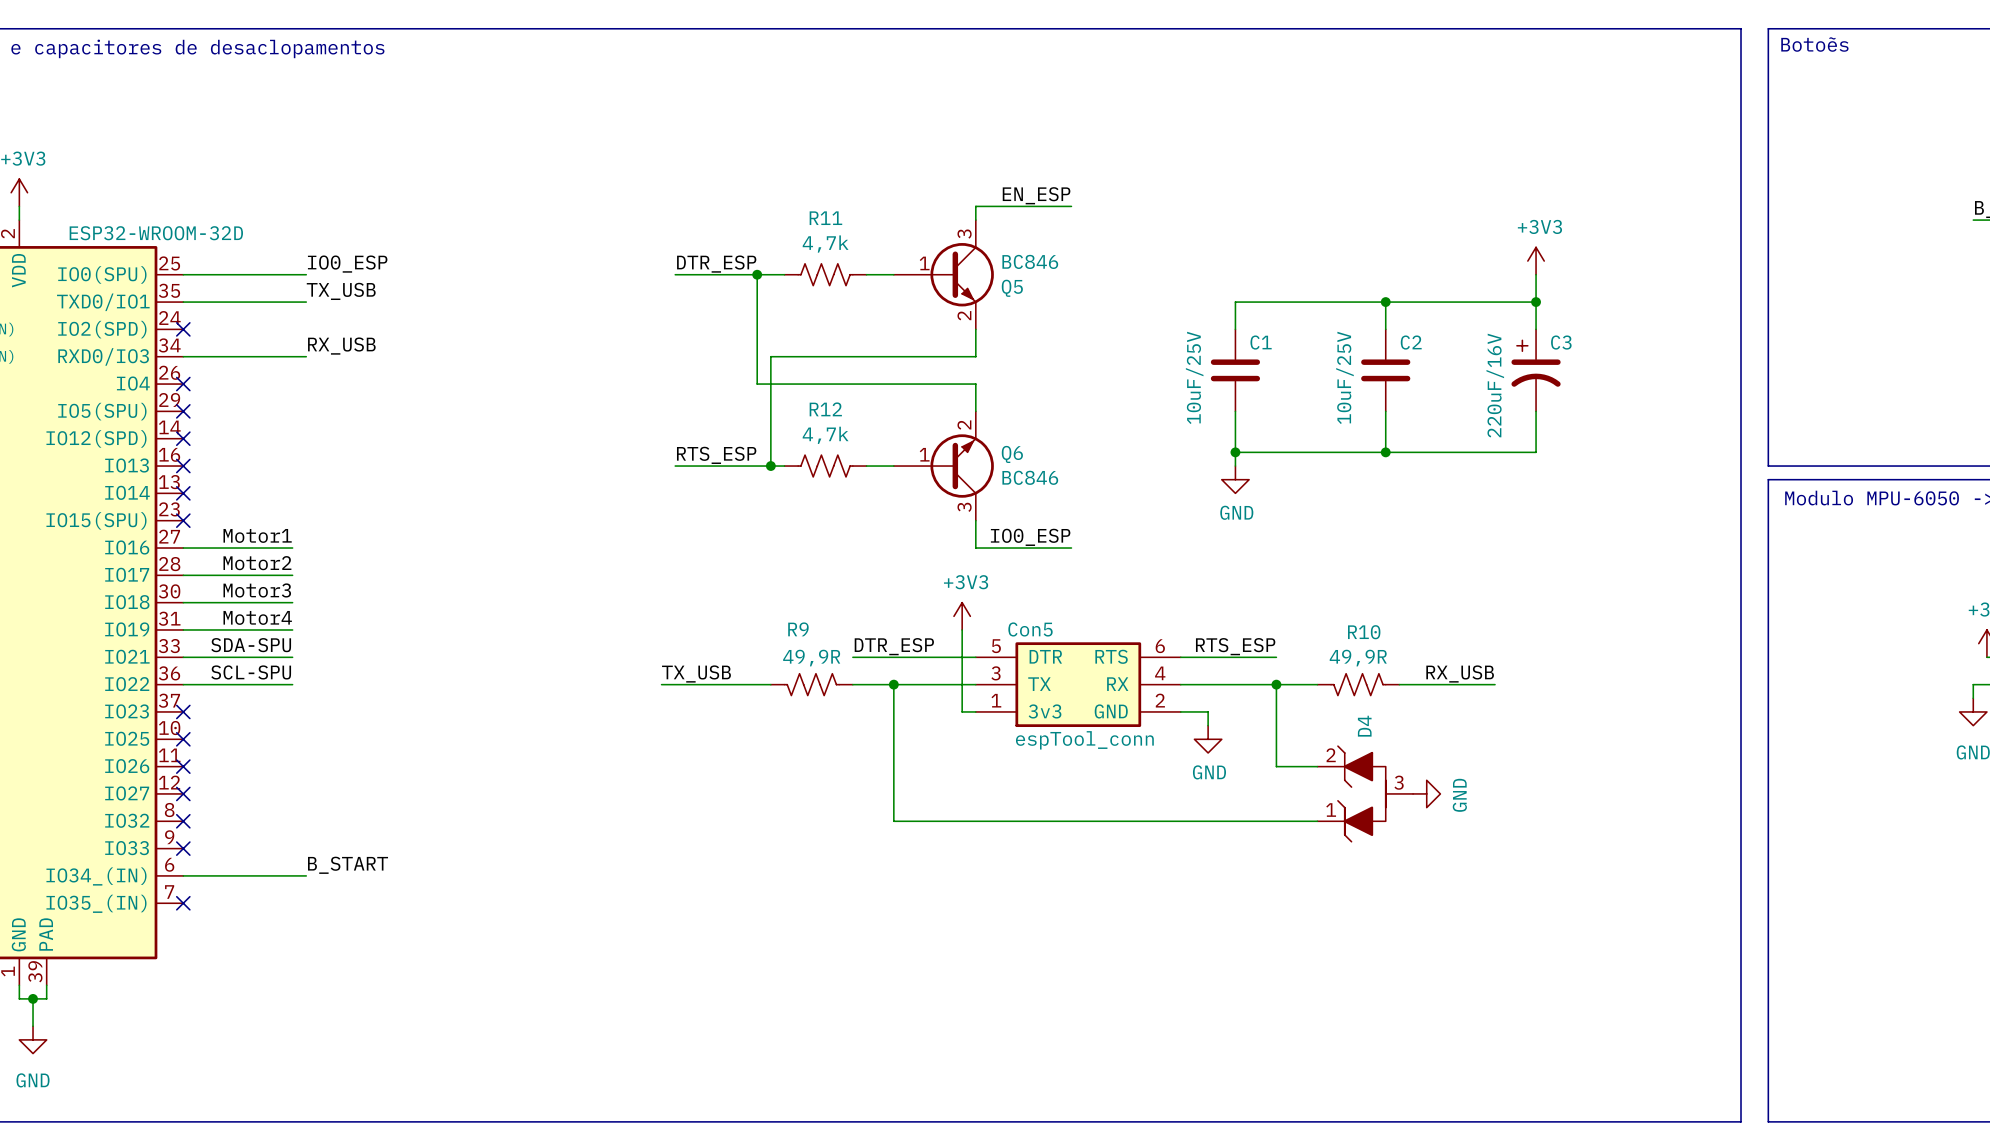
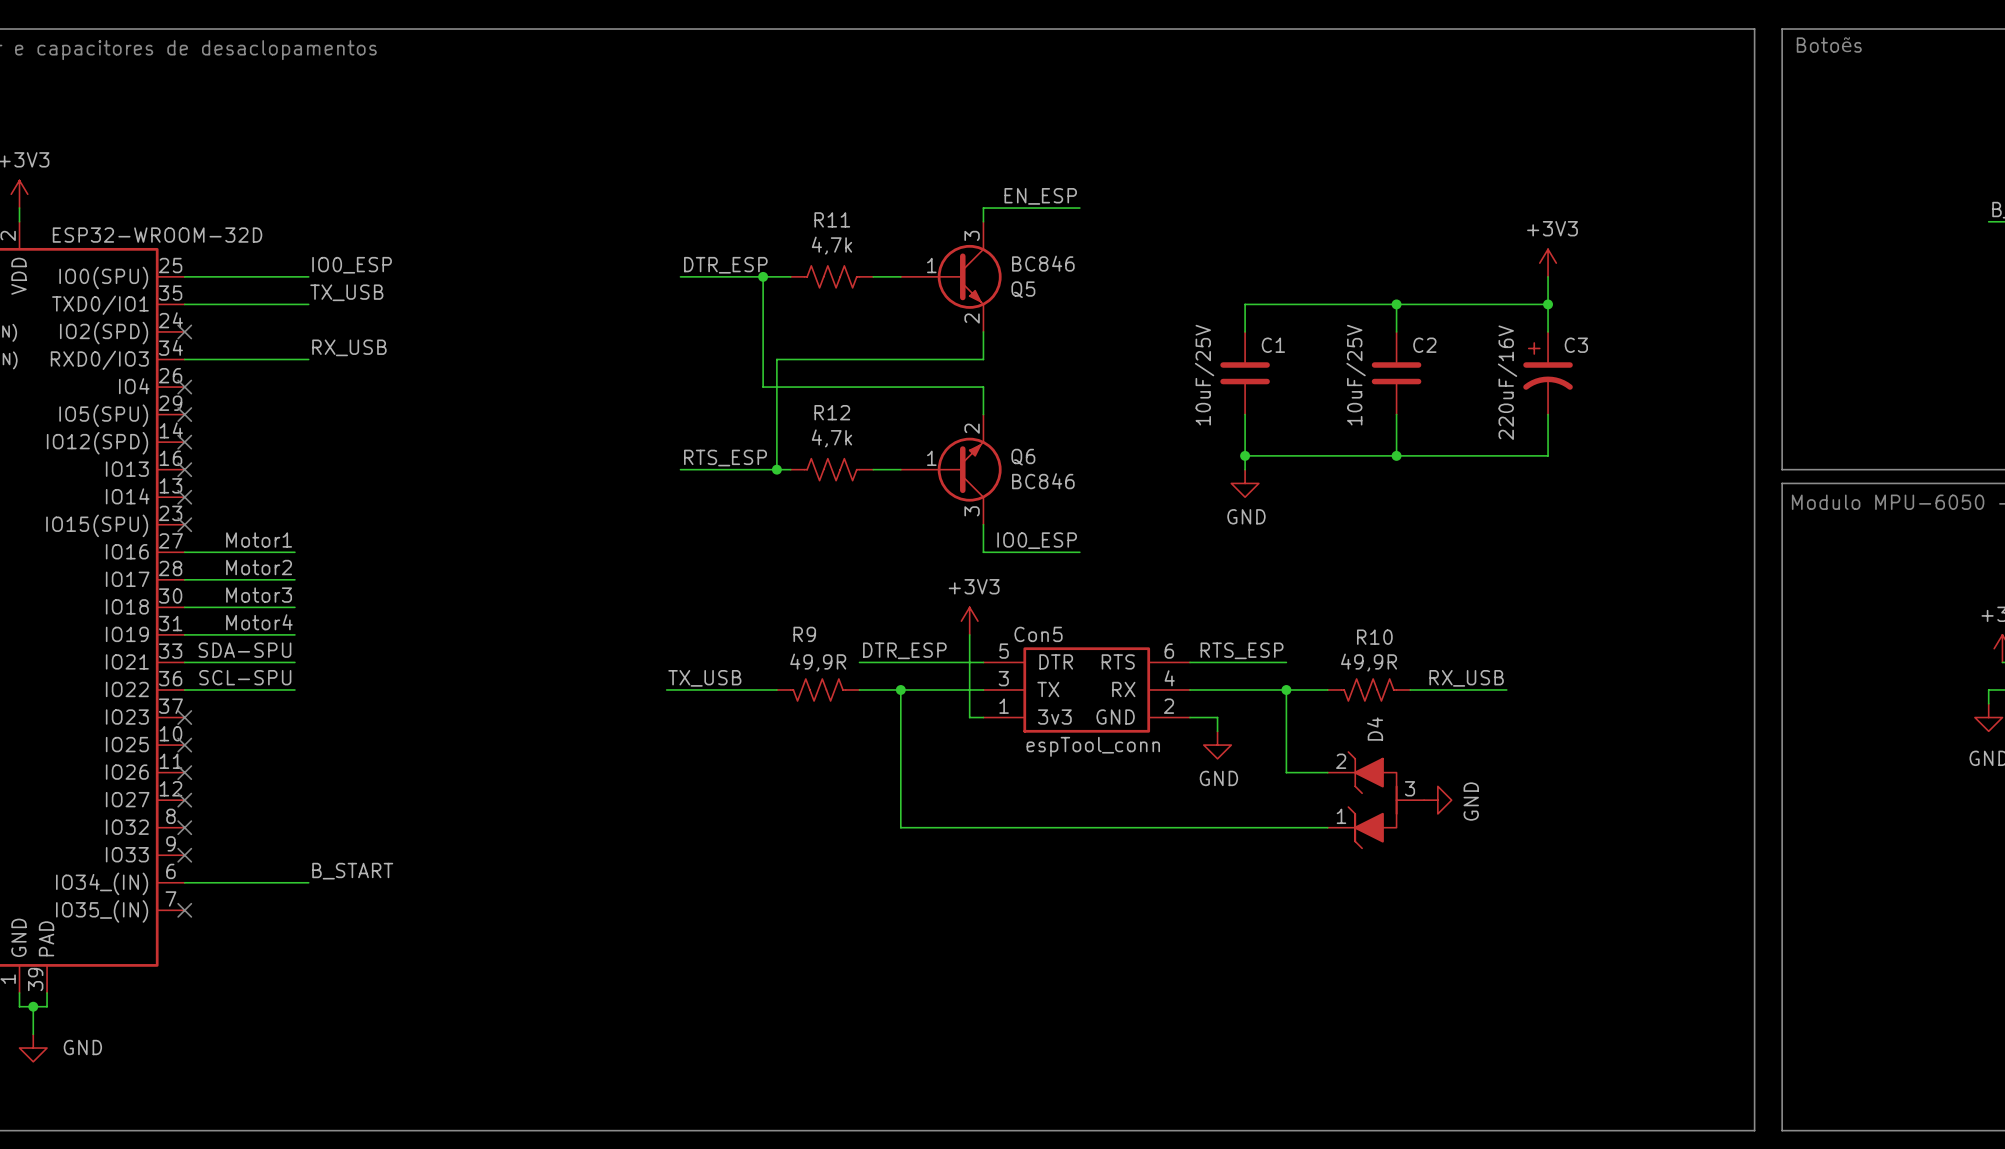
power symbol text position: GND (33, 1080) -> GND (82, 1047)

